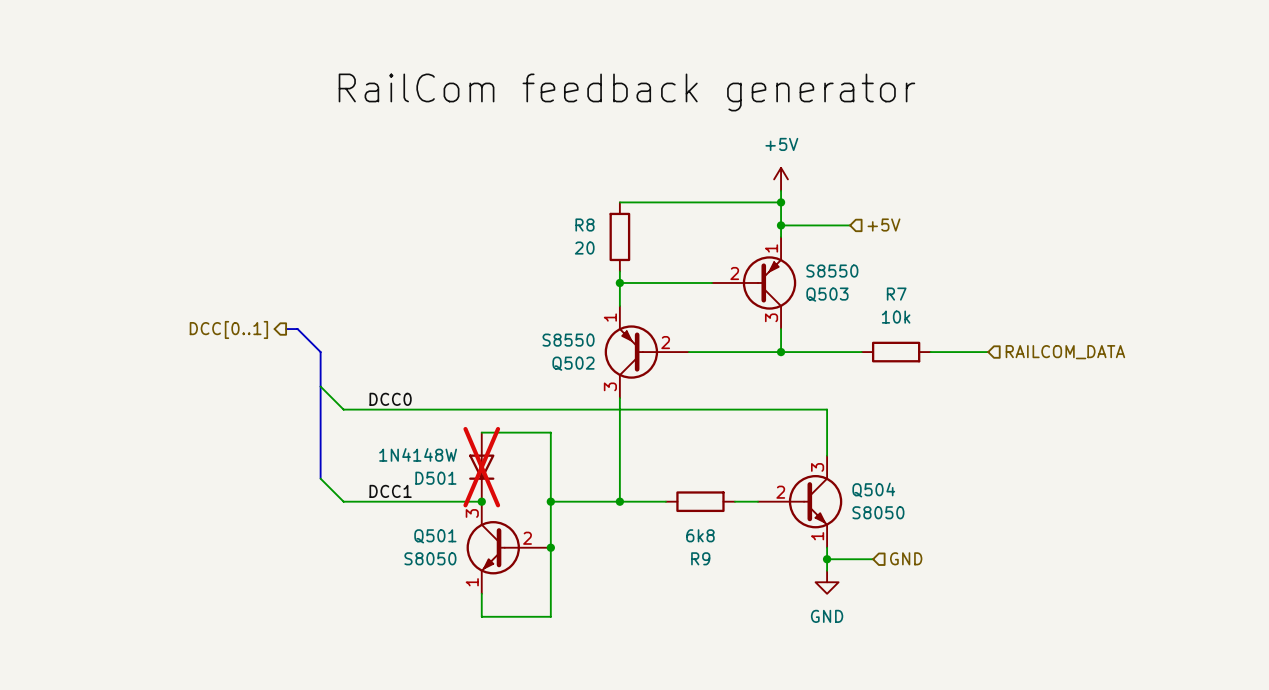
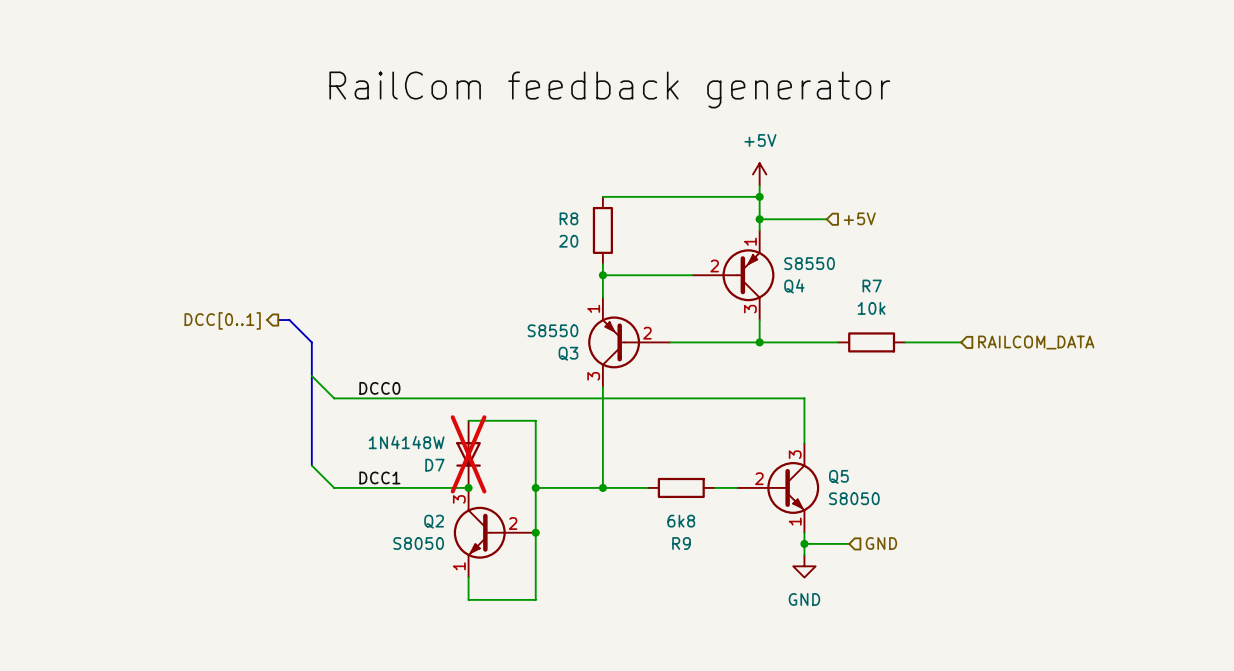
Q503 name: Q503 (827, 294) -> Q4 (794, 286)
Q502 name: Q502 (573, 363) -> Q3 (568, 353)
D501 name: D501 (435, 478) -> D7 (434, 465)
Q504 name: Q504 (873, 490) -> Q5 (838, 476)
Q501 name: Q501 (435, 536) -> Q2 (434, 521)

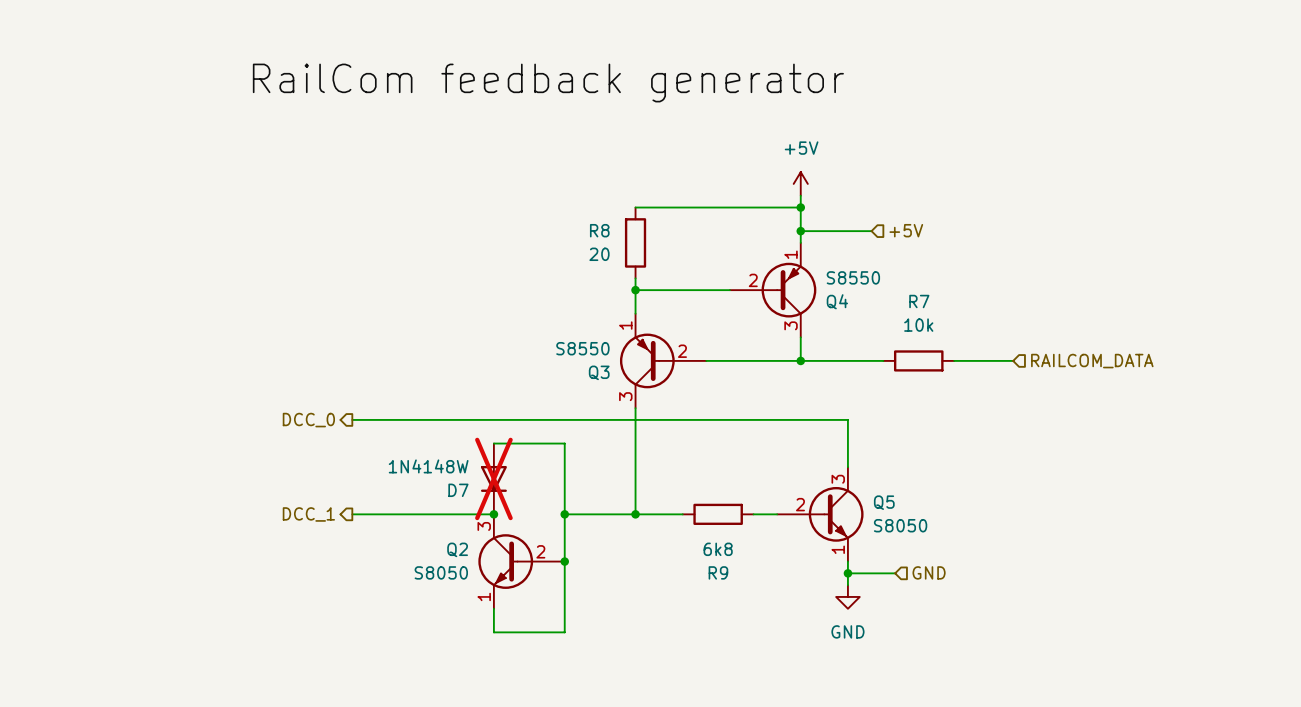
label position: RailCom feedback generator (609, 89) -> RailCom feedback generator (548, 83)
hierarchical label: DCC[0..1] (222, 320) -> none
bus: (278, 320) (289, 320) (311, 342) (311, 465) -> none
wire: (311, 376) (334, 398) -> none
label: DCC0 (379, 388) -> none
hierarchical label: none -> DCC_0 (308, 420)
wire: (311, 465) (334, 487) -> none
label: DCC1 (379, 477) -> none
hierarchical label: none -> DCC_1 (308, 514)

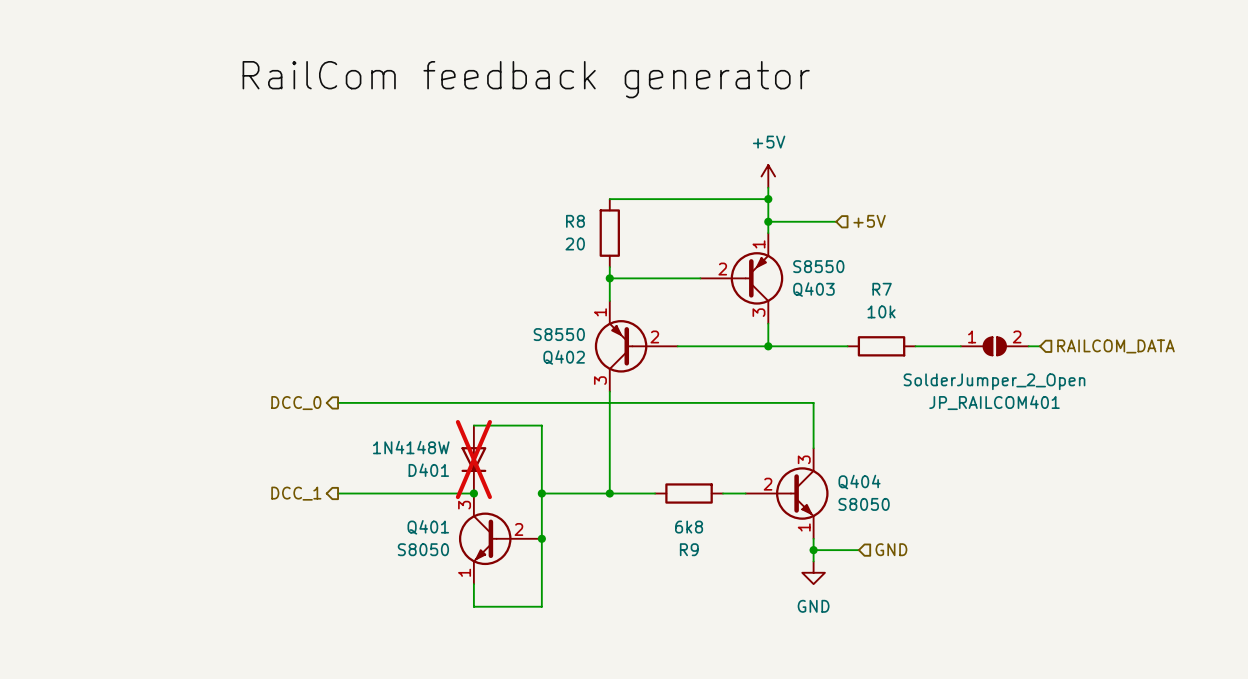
Q4 name: Q4 (837, 301) -> Q403 (813, 289)
JP_RAILCOM401: none -> SolderJumper_2_Open (994, 346)
hierarchical label position: RAILCOM_DATA (1092, 361) -> RAILCOM_DATA (1115, 346)
Q3 name: Q3 (599, 372) -> Q402 (564, 357)
D7 name: D7 (458, 490) -> D401 (428, 470)
Q5 name: Q5 (884, 502) -> Q404 (859, 482)
Q2 name: Q2 (457, 549) -> Q401 (428, 527)

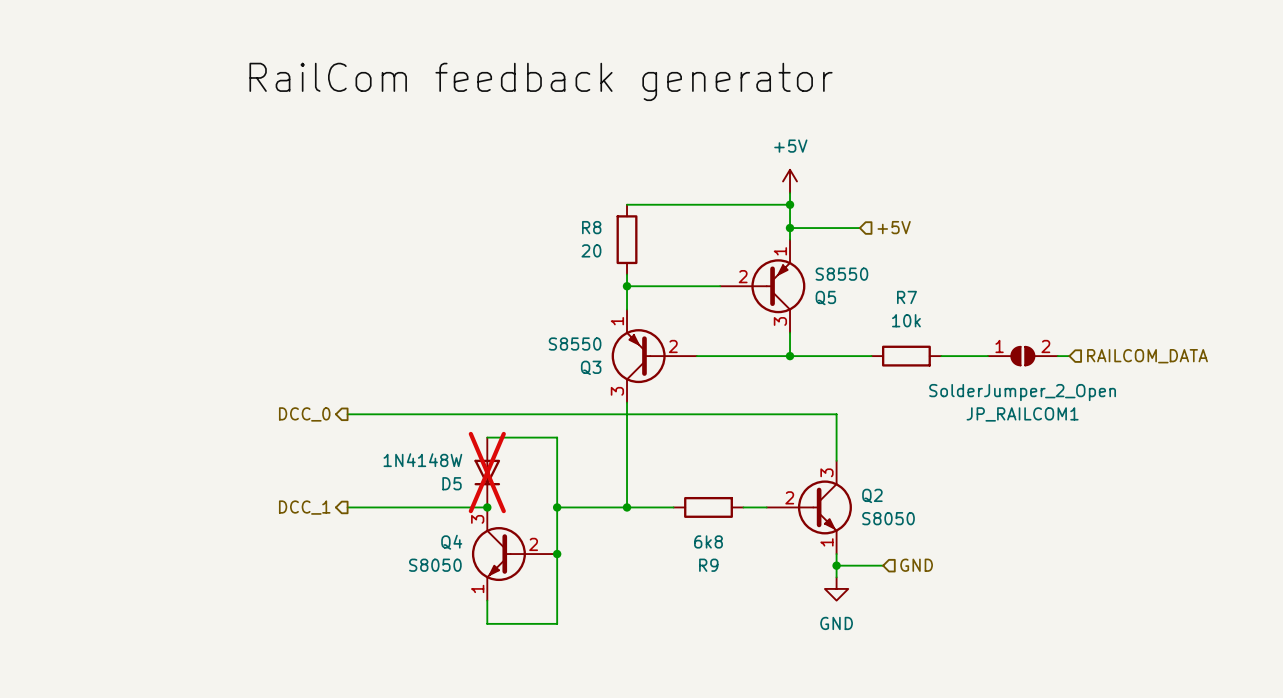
Q403 name: Q403 (813, 289) -> Q5 (825, 298)
Q402 name: Q402 (564, 357) -> Q3 (591, 367)
JP_RAILCOM401 name: JP_RAILCOM401 (994, 402) -> JP_RAILCOM1 (1022, 414)
D401 name: D401 (428, 470) -> D5 (452, 483)
Q404 name: Q404 (859, 482) -> Q2 (872, 495)
Q401 name: Q401 (428, 527) -> Q4 (451, 542)

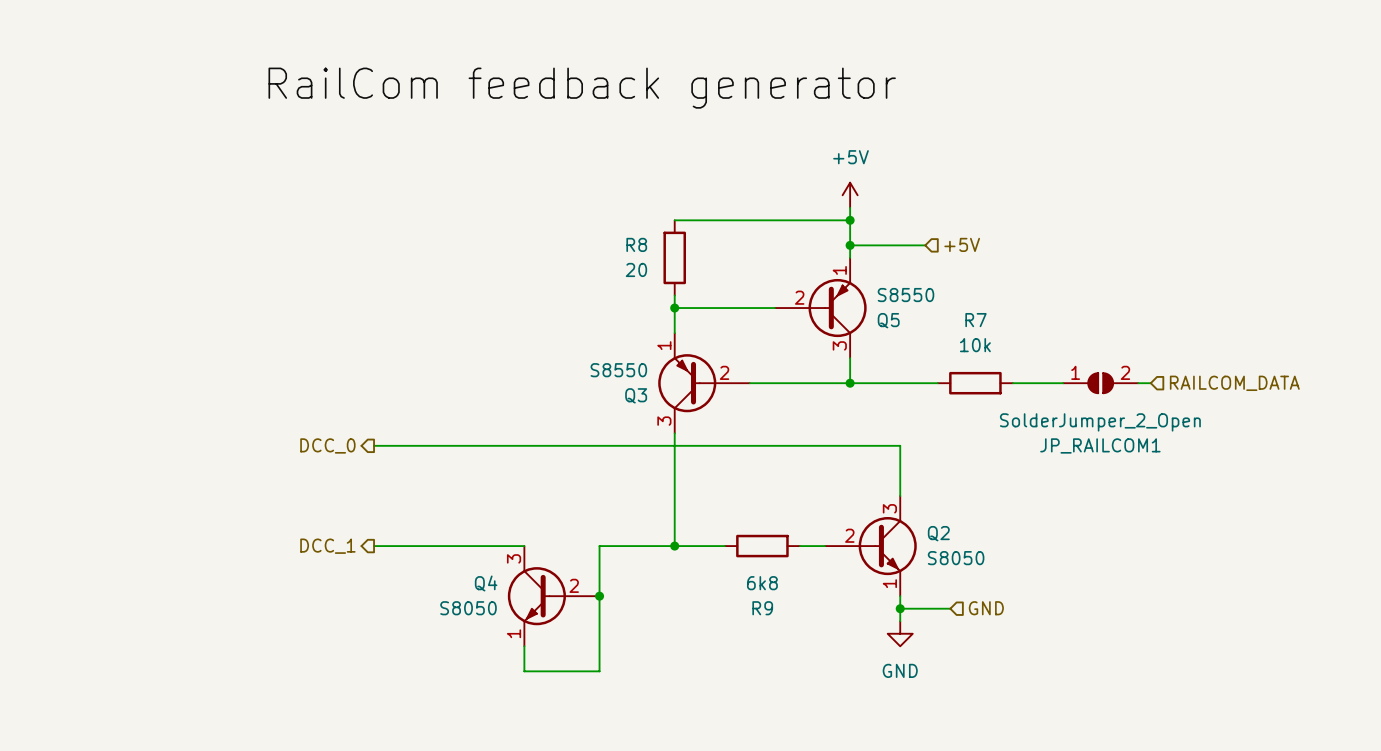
wire: (487, 437) (557, 437) (557, 507) -> none
D5: 1N4148W (487, 472) -> none
junction: (487, 507) -> none
junction: (557, 507) -> none

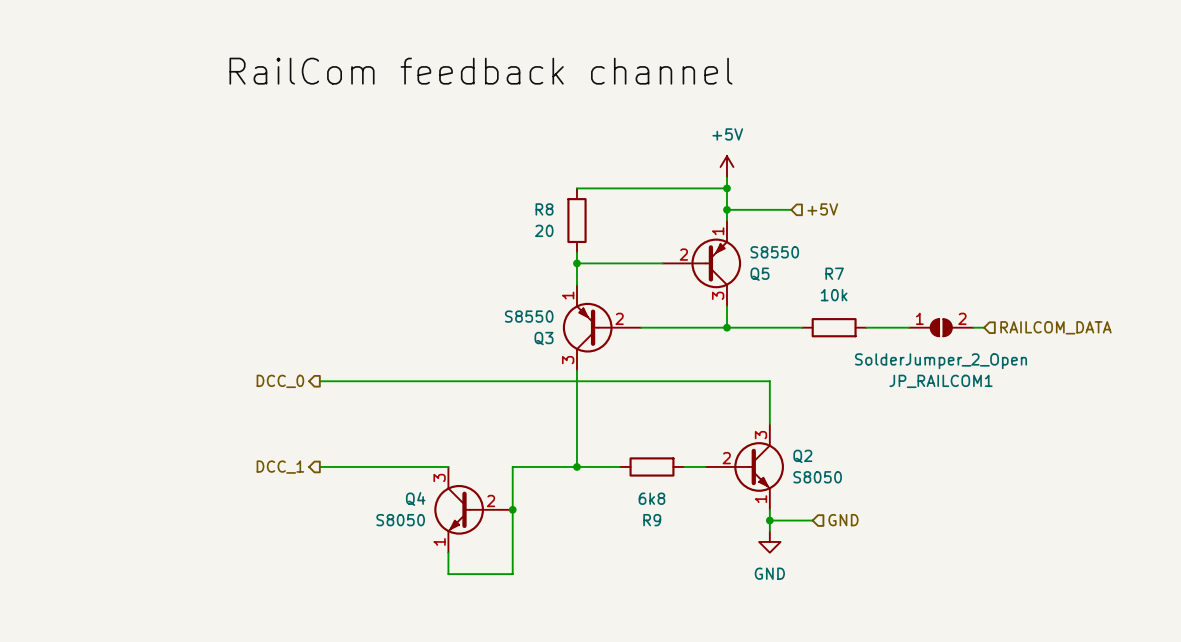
label: RailCom feedback generator (582, 88) -> RailCom feedback channel (480, 71)

